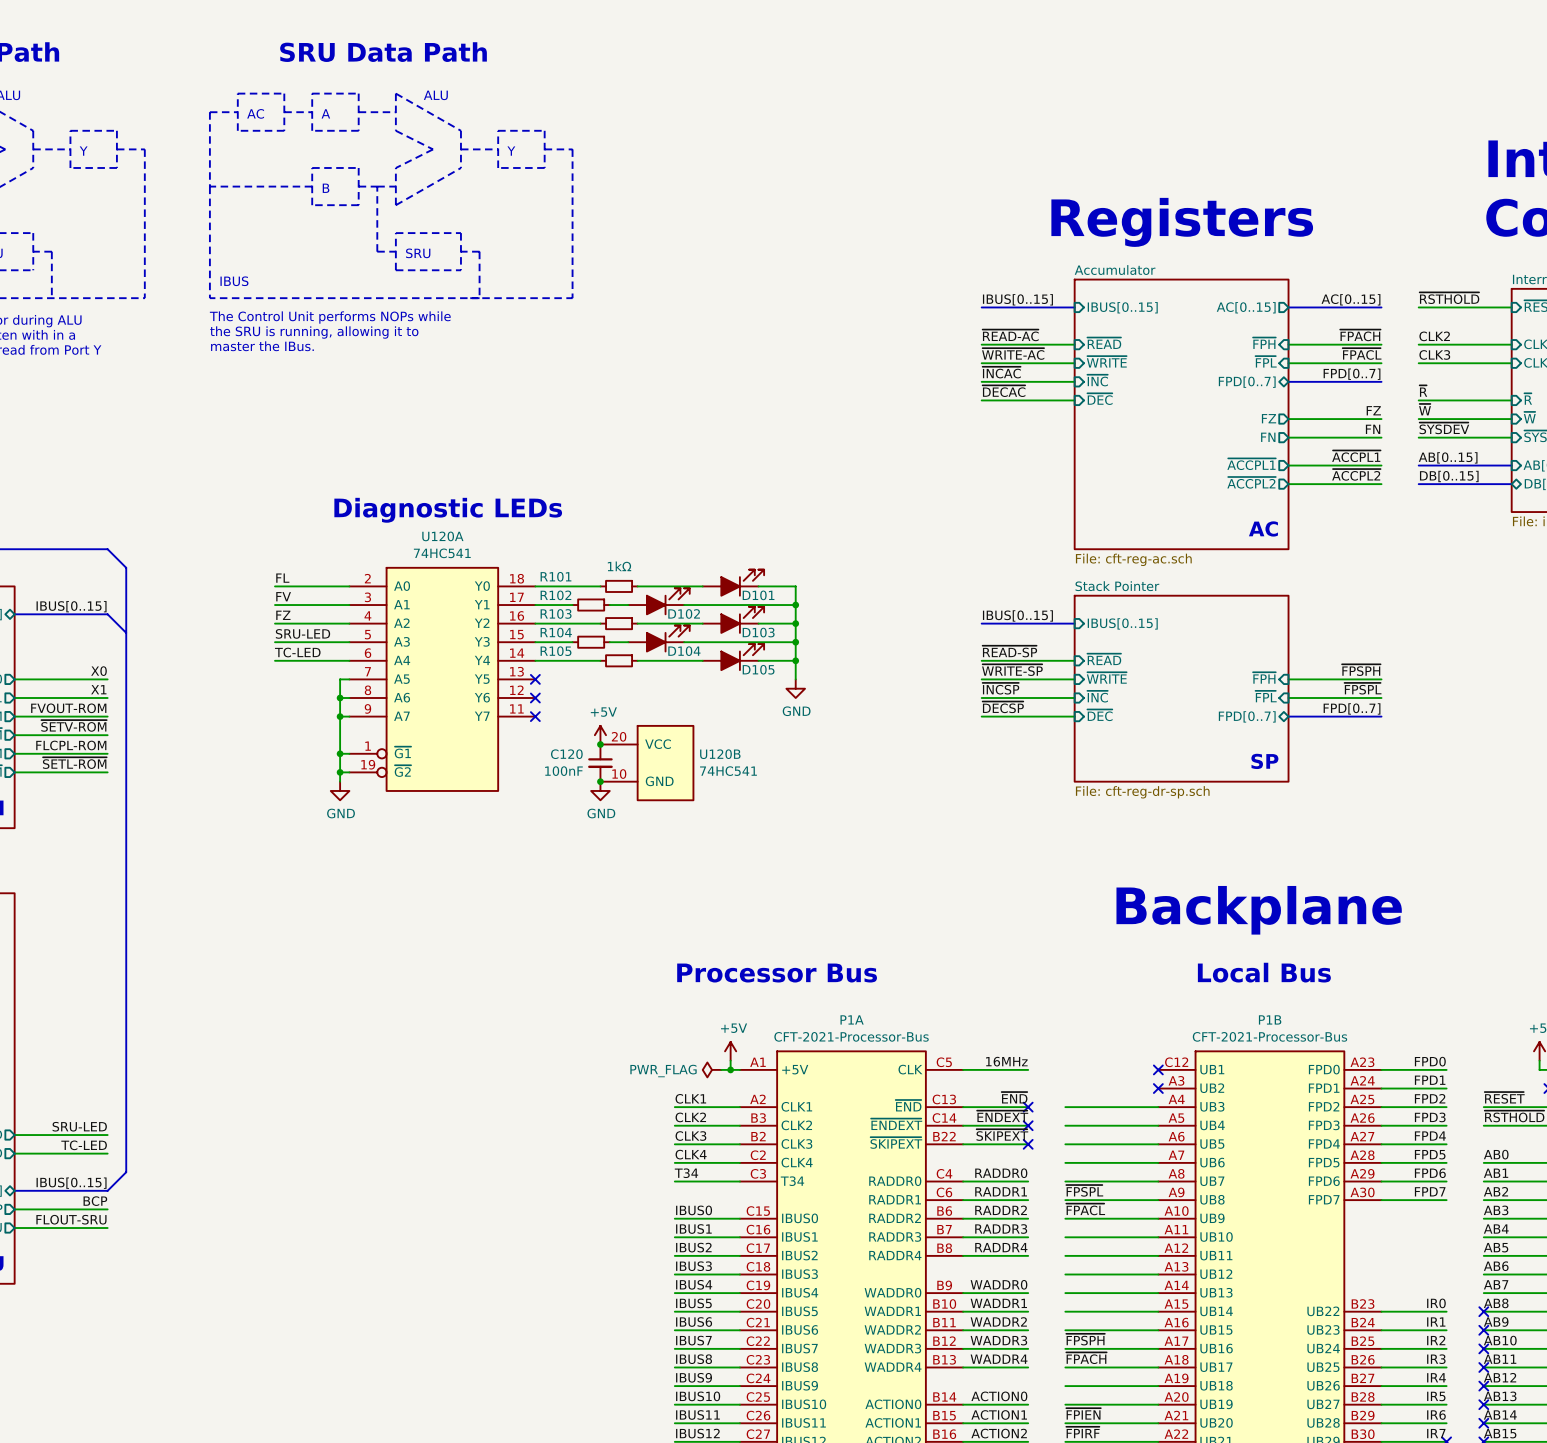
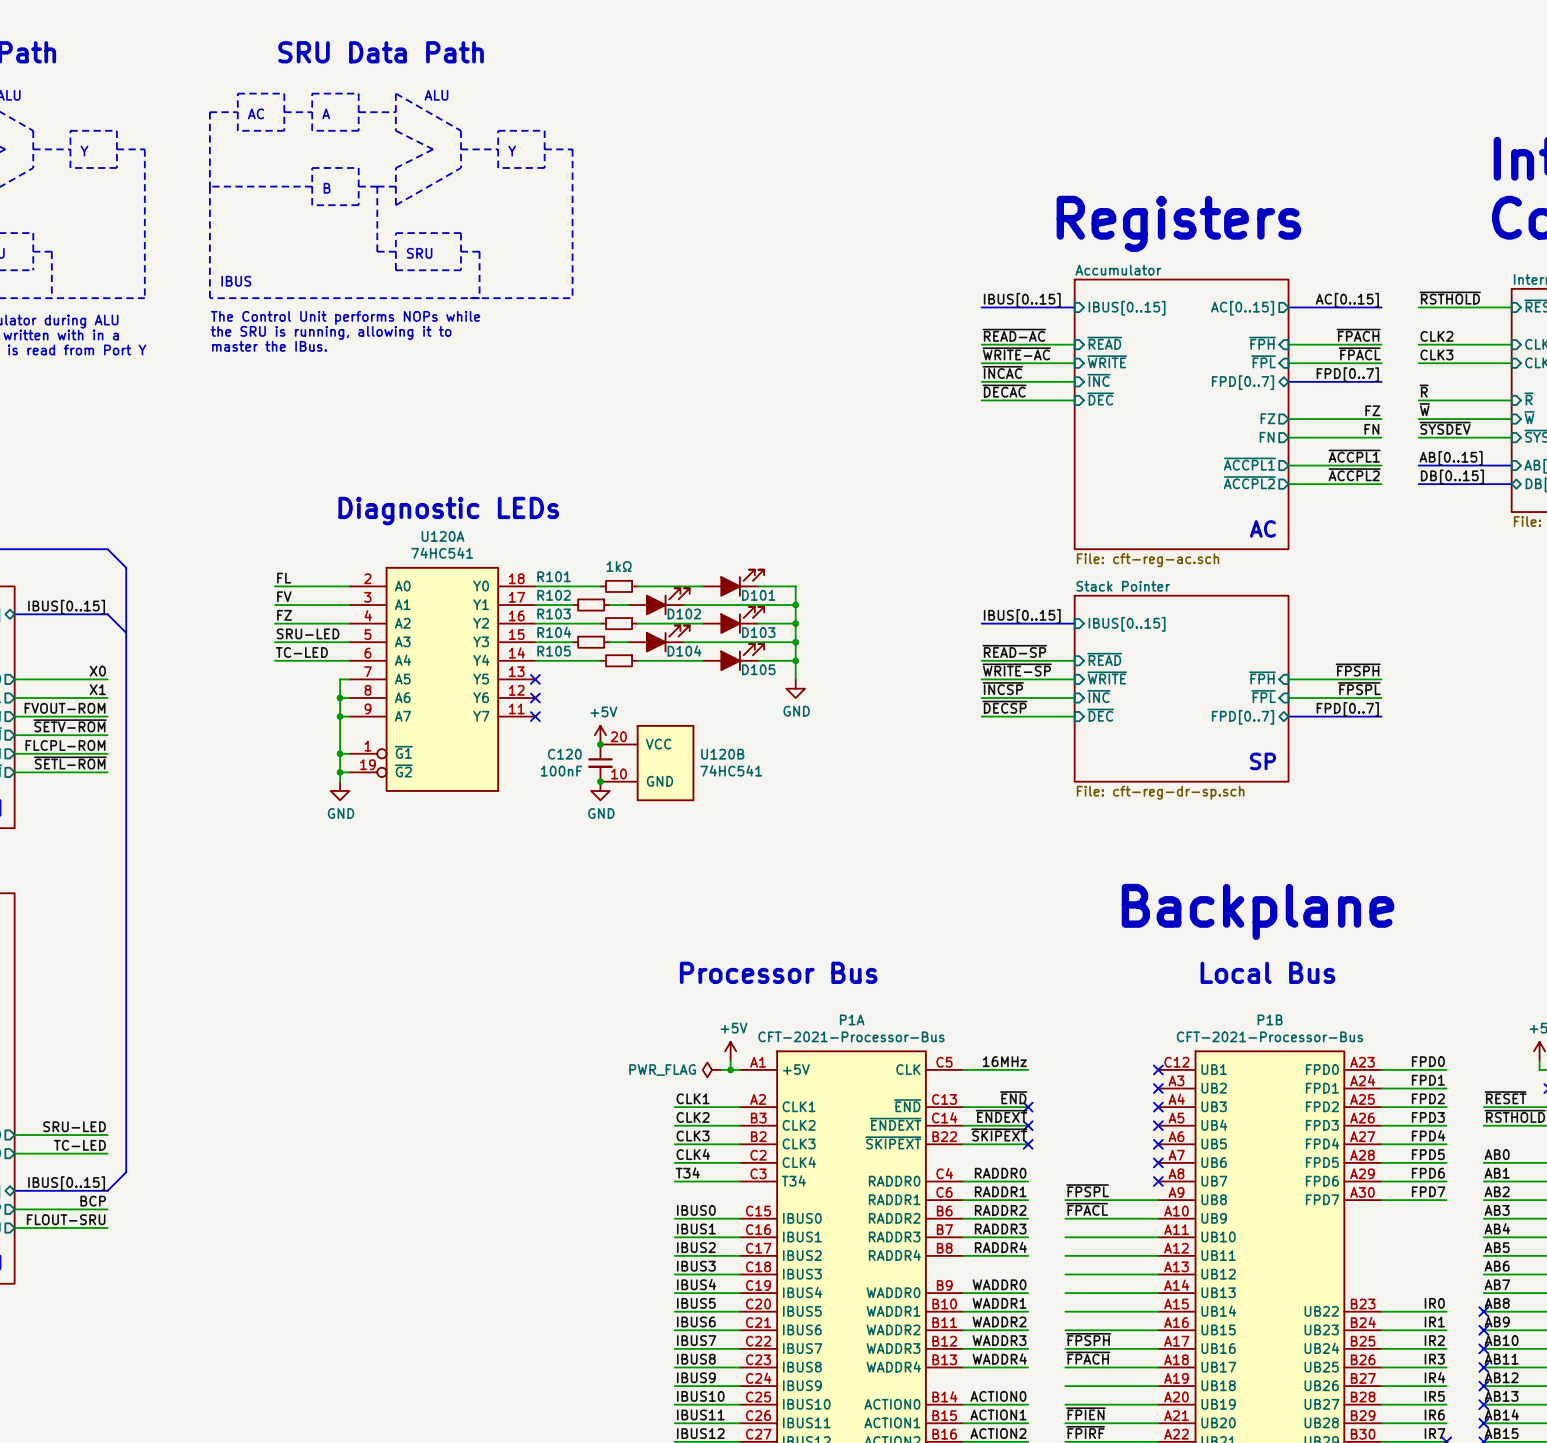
wire: (1065, 1107) (1158, 1107) -> none
no-connect mark: none -> (1158, 1107)
wire: (1065, 1125) (1158, 1125) -> none
no-connect mark: none -> (1158, 1125)
wire: (1065, 1144) (1158, 1144) -> none
no-connect mark: none -> (1158, 1144)
wire: (1065, 1162) (1158, 1162) -> none
no-connect mark: none -> (1158, 1162)
wire: (1065, 1181) (1158, 1181) -> none
no-connect mark: none -> (1158, 1181)

